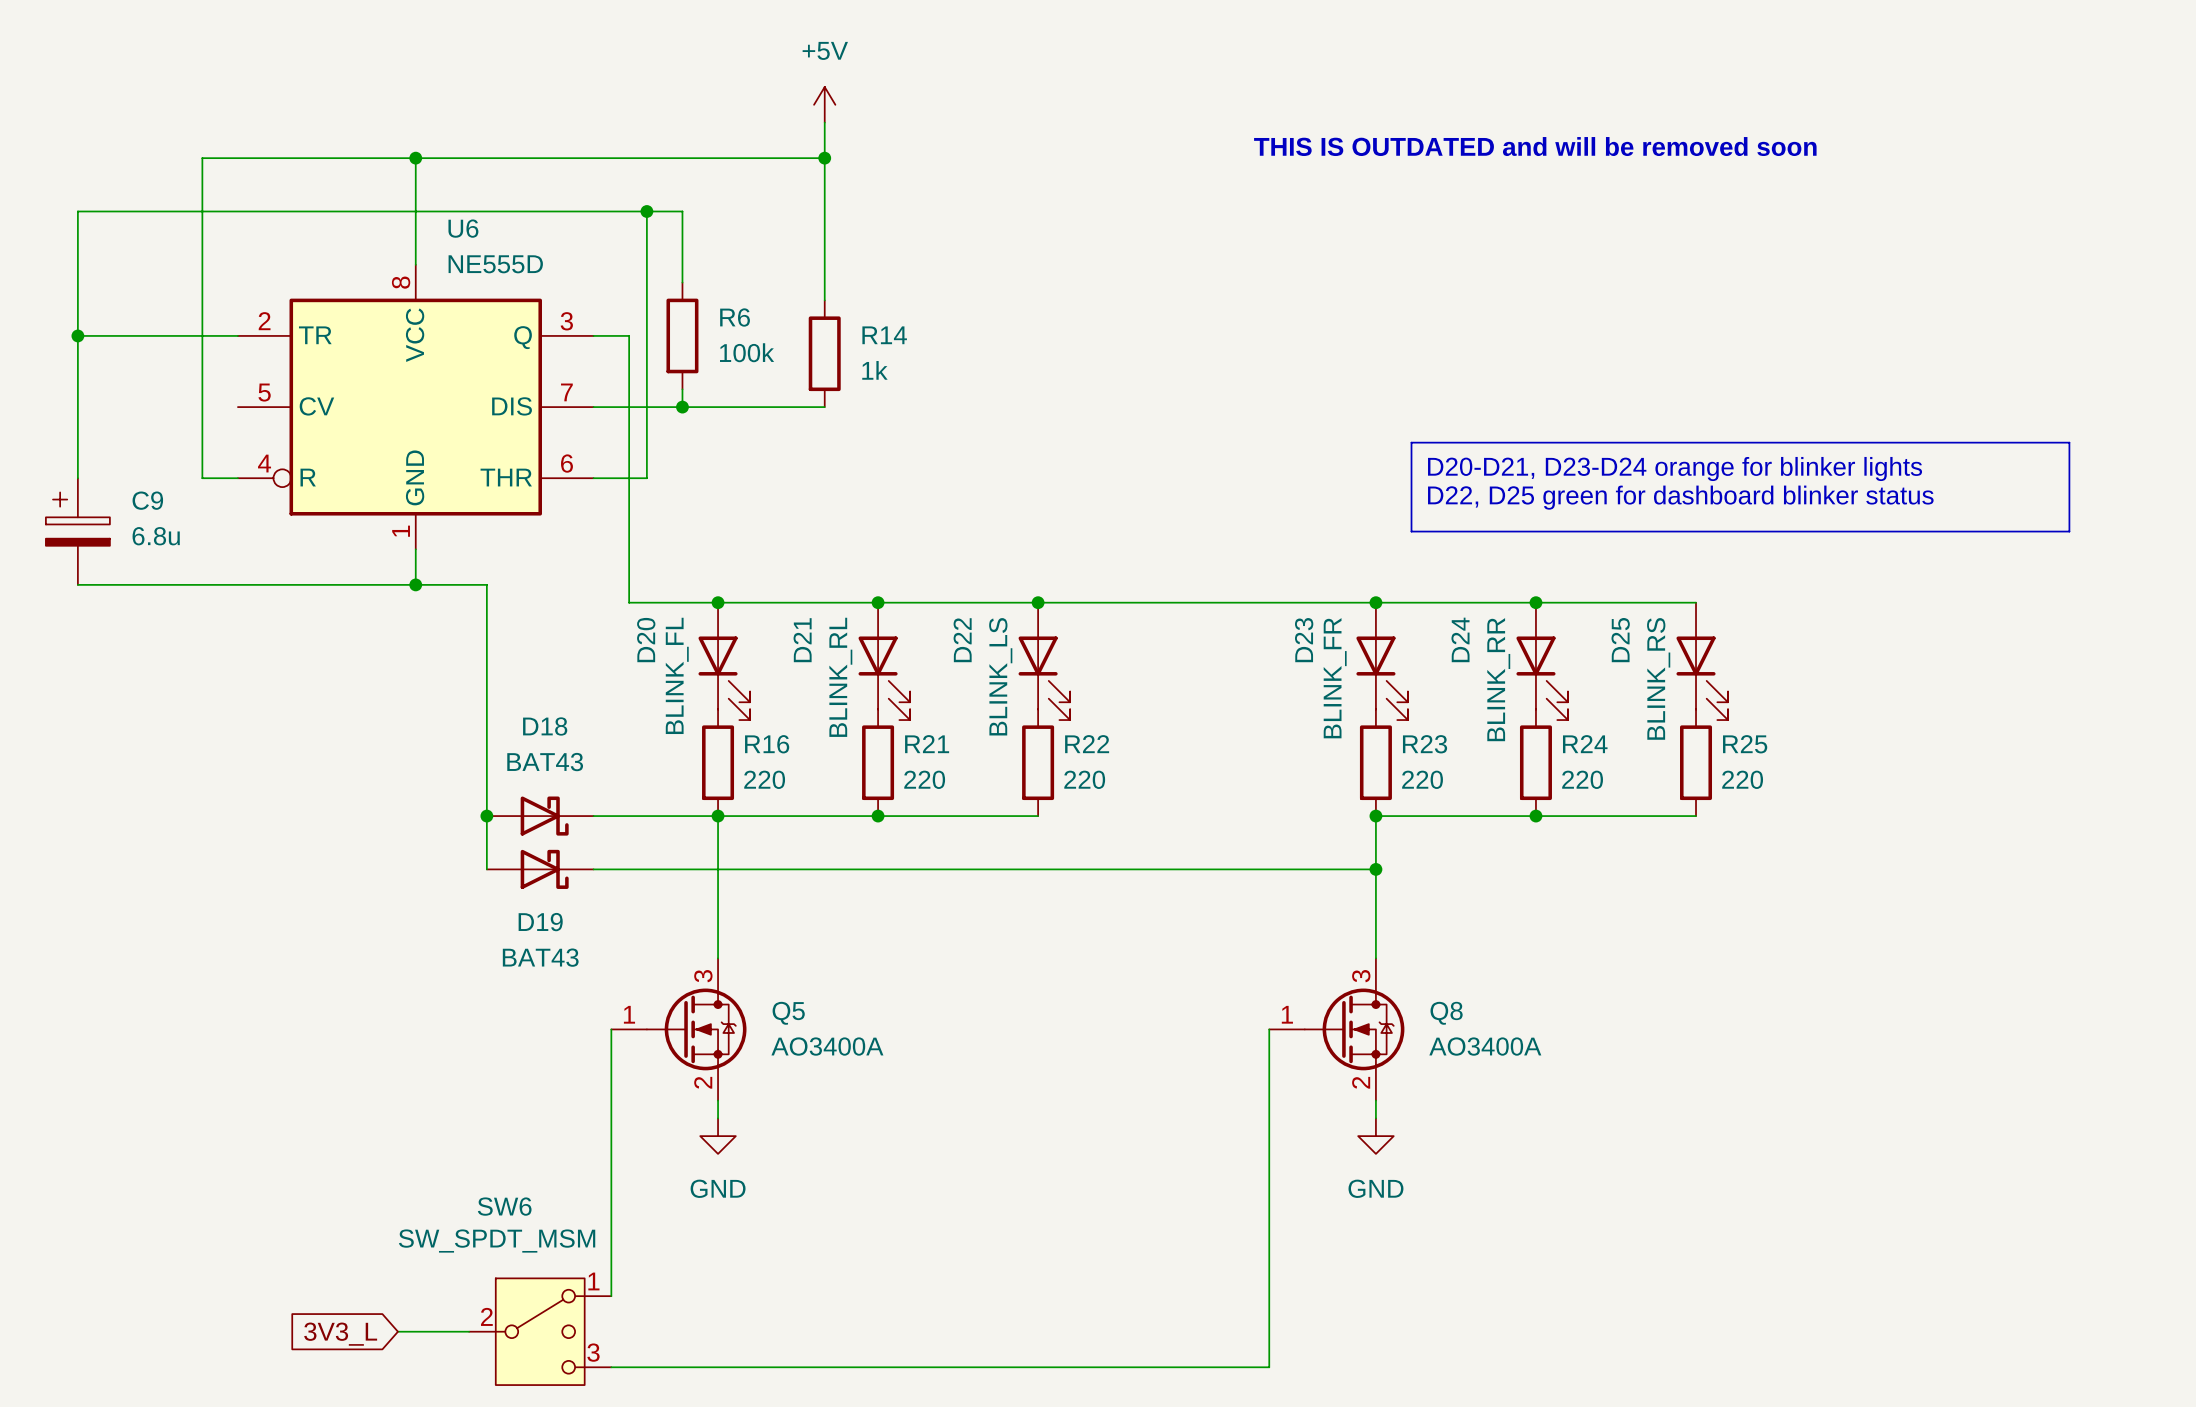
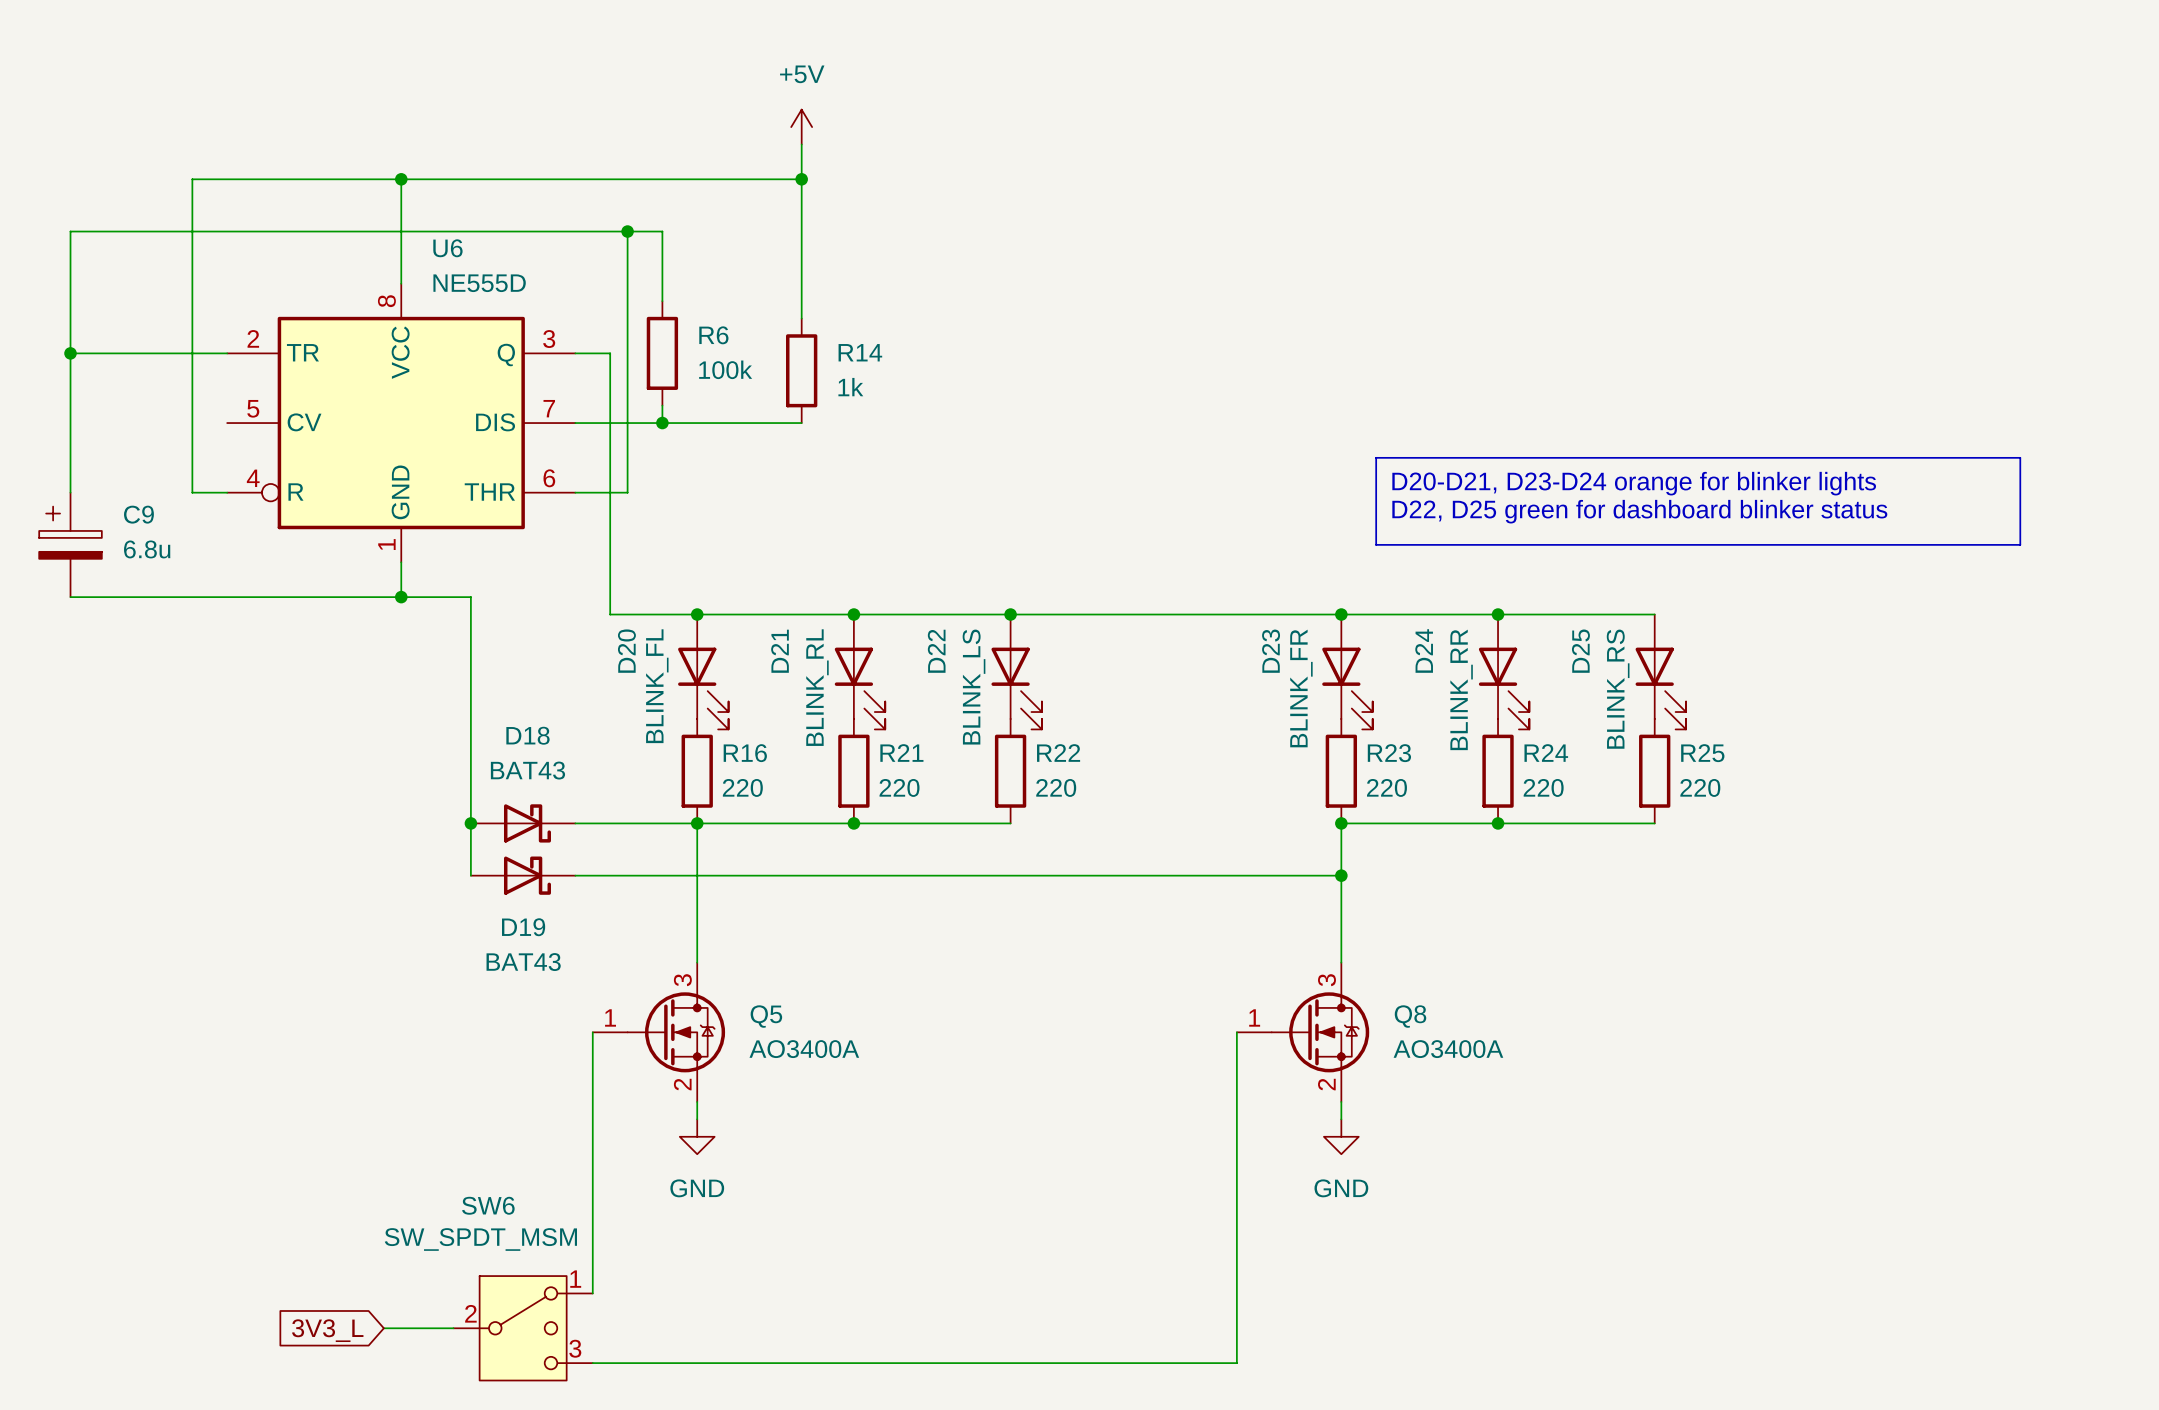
text: THIS IS OUTDATED and will be removed soon (1535, 146) -> none

